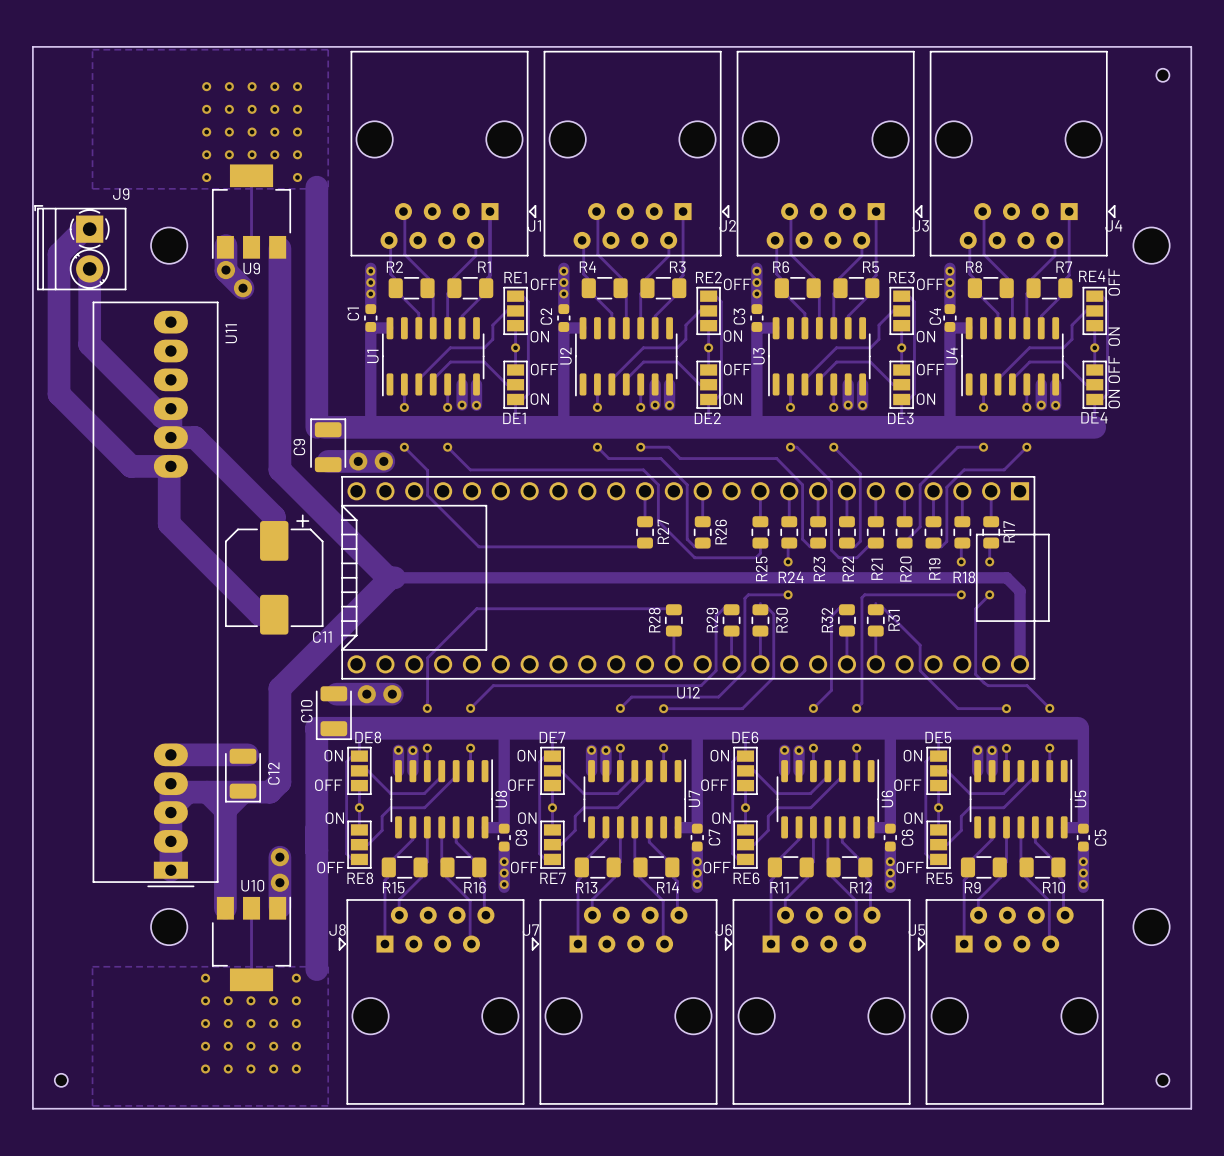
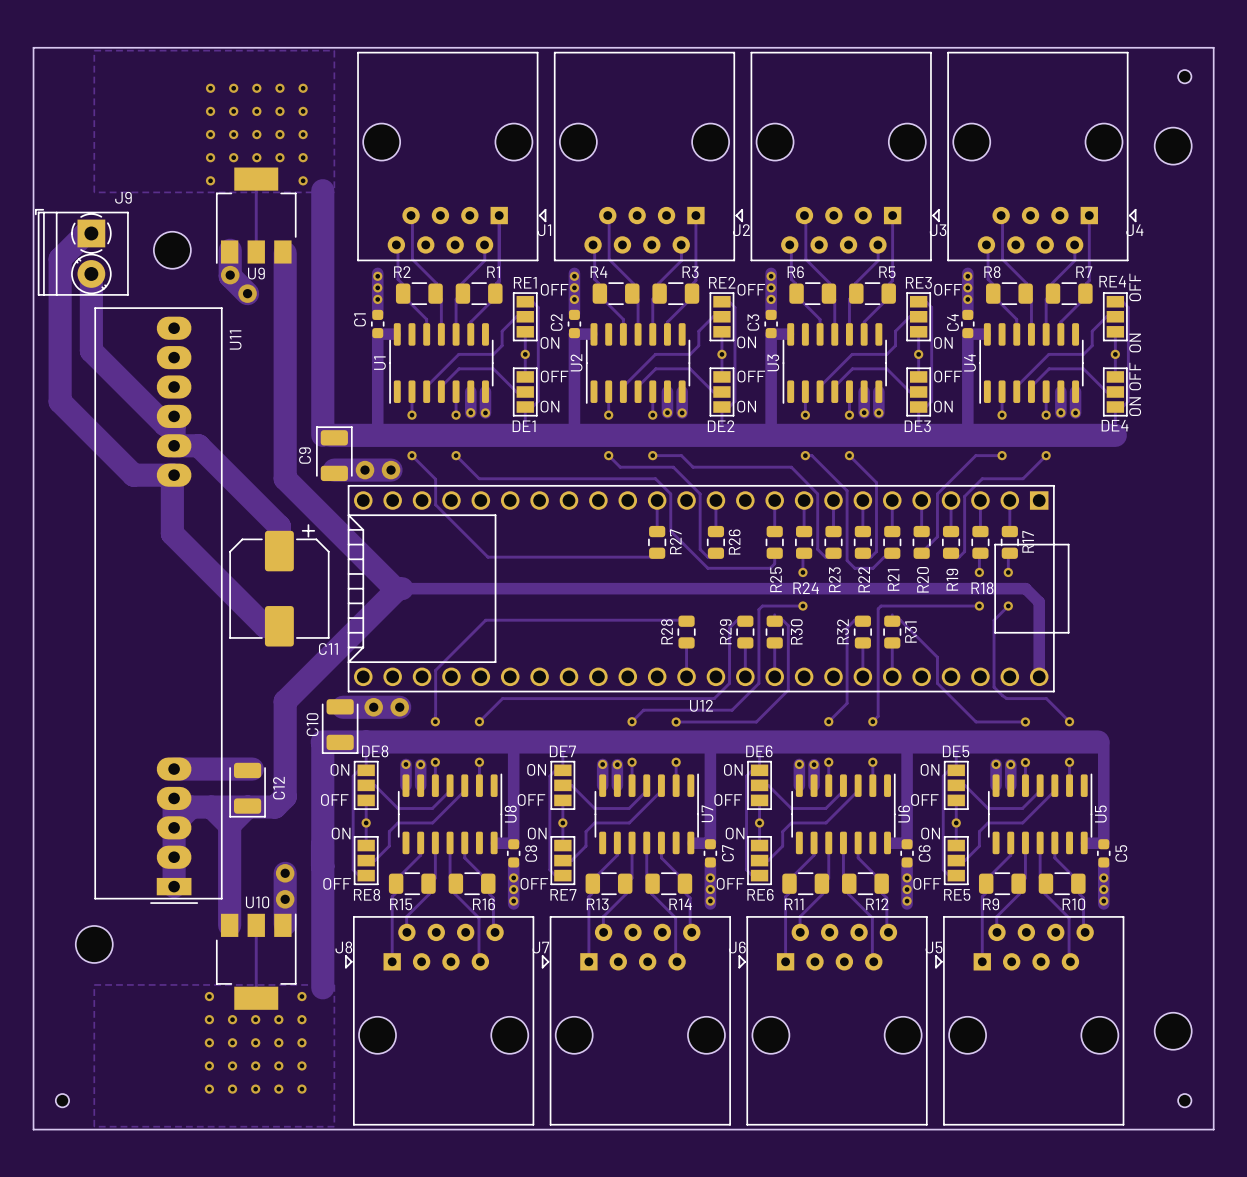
part position: (1151, 245) -> (1173, 146)
part position: (169, 927) -> (94, 944)
part position: (1151, 927) -> (1173, 1031)

